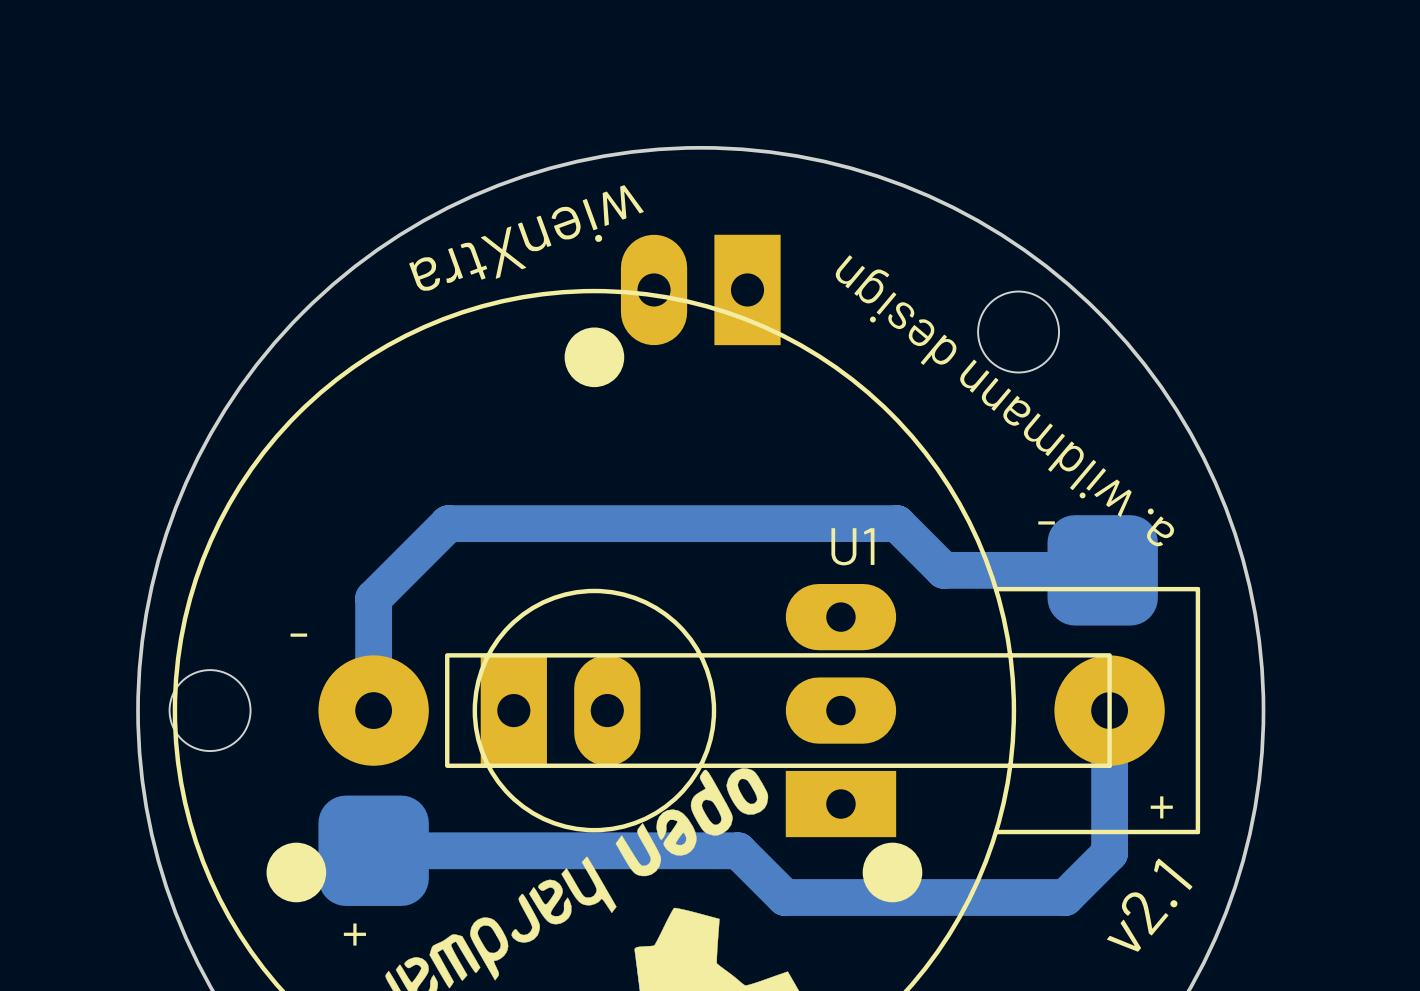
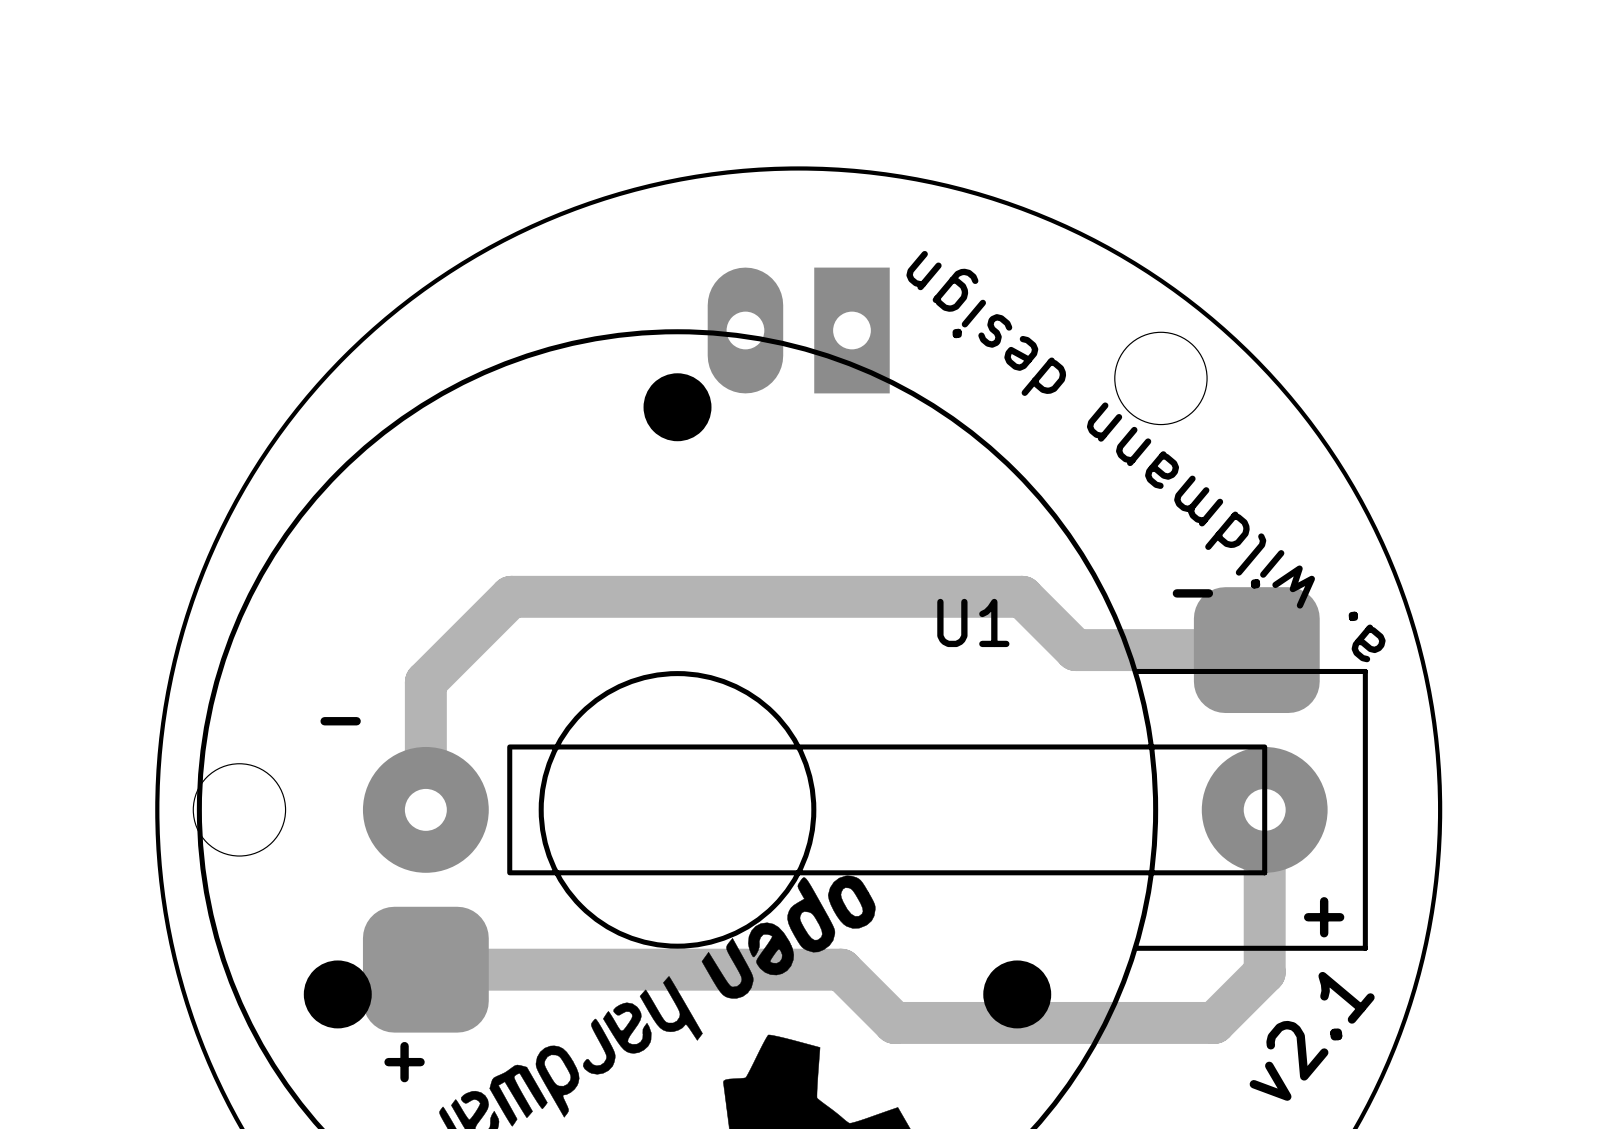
text: wienXtra (526, 238) -> none
part: (560, 710) -> none
part: (840, 710) -> none

